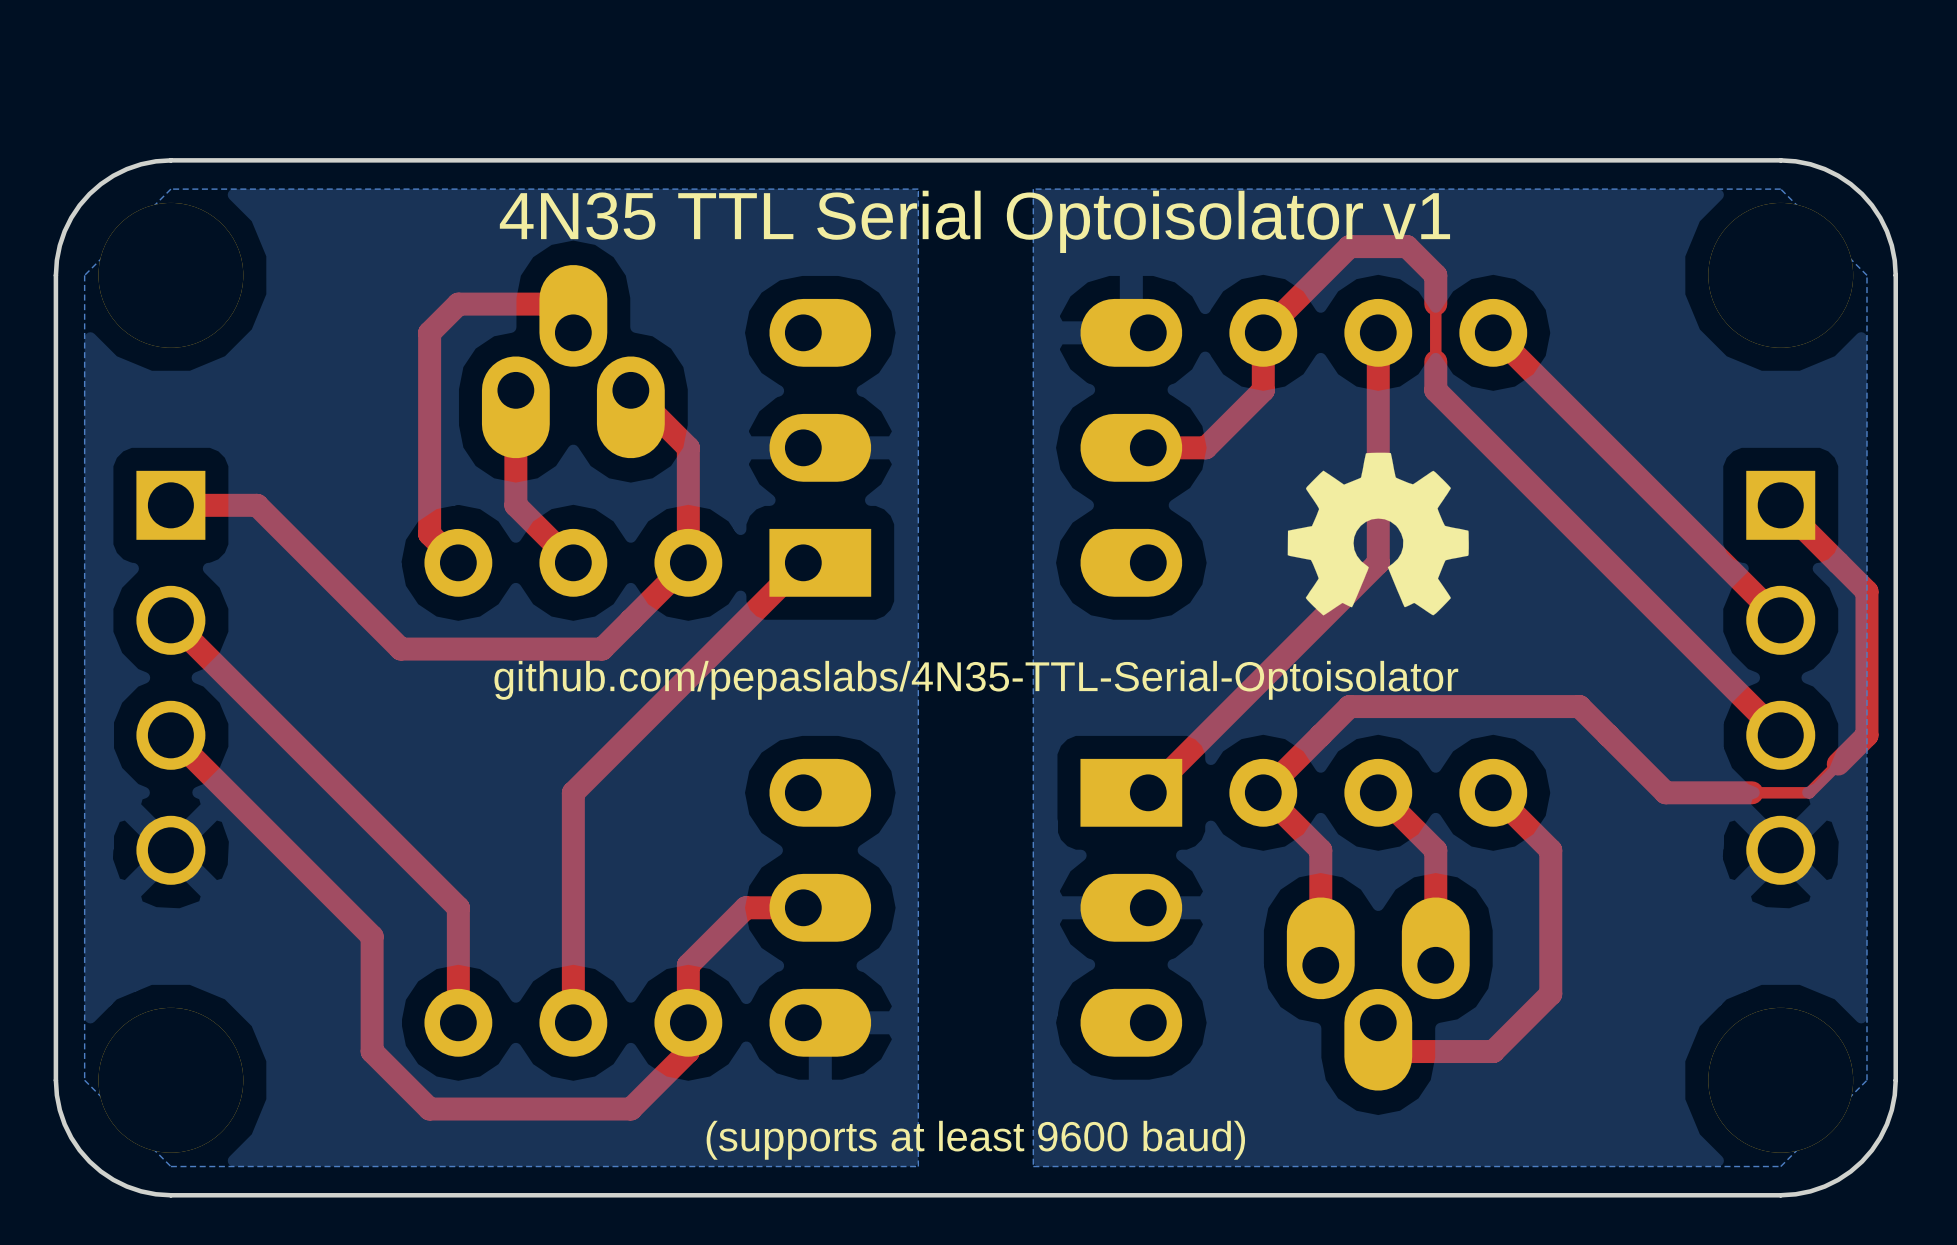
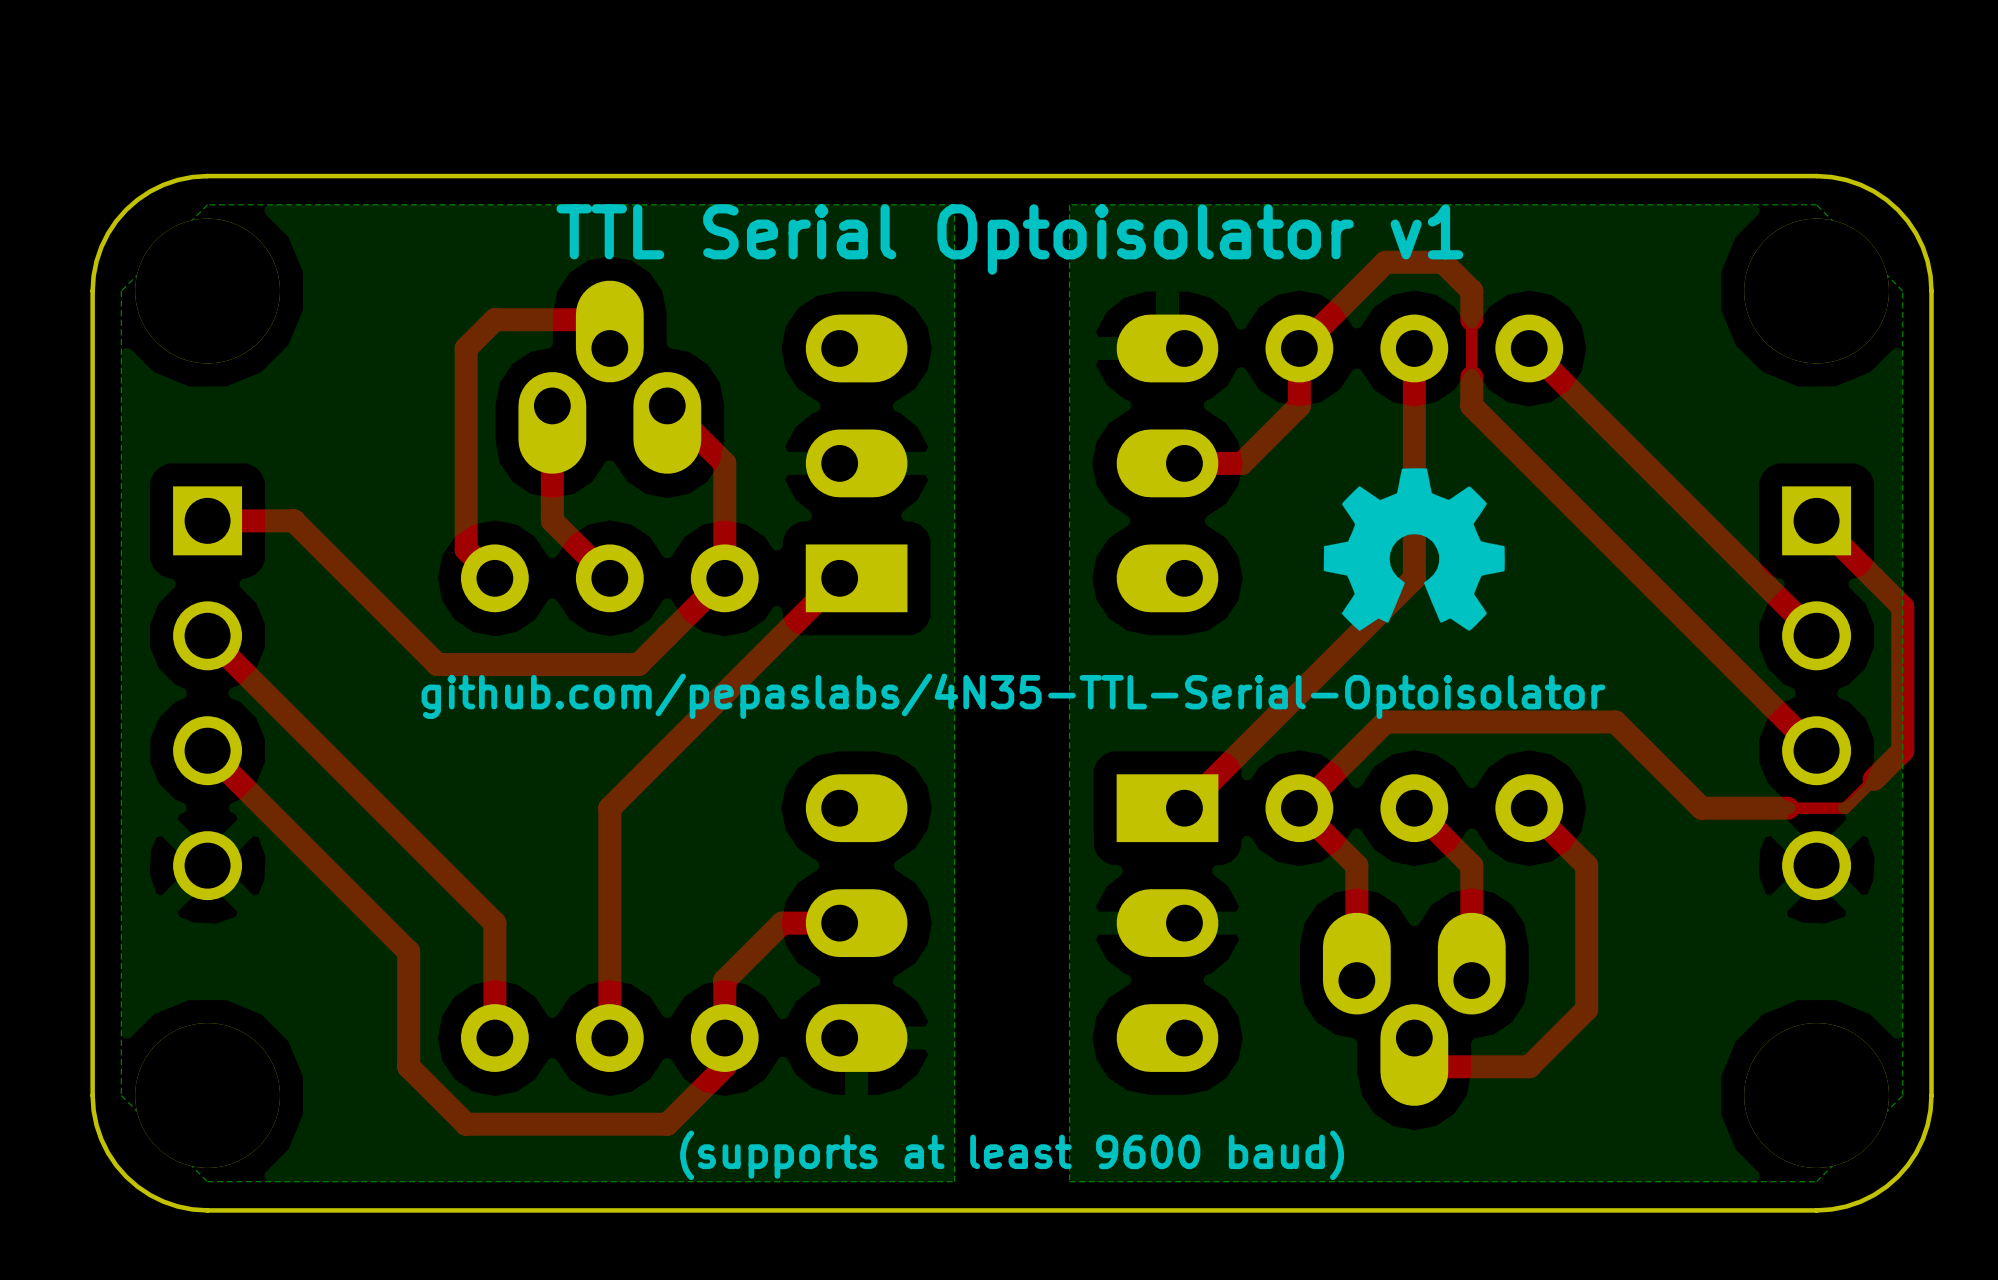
text: 4N35 TTL Serial Optoisolator v1 (974, 221) -> TTL Serial Optoisolator v1 (1009, 239)

